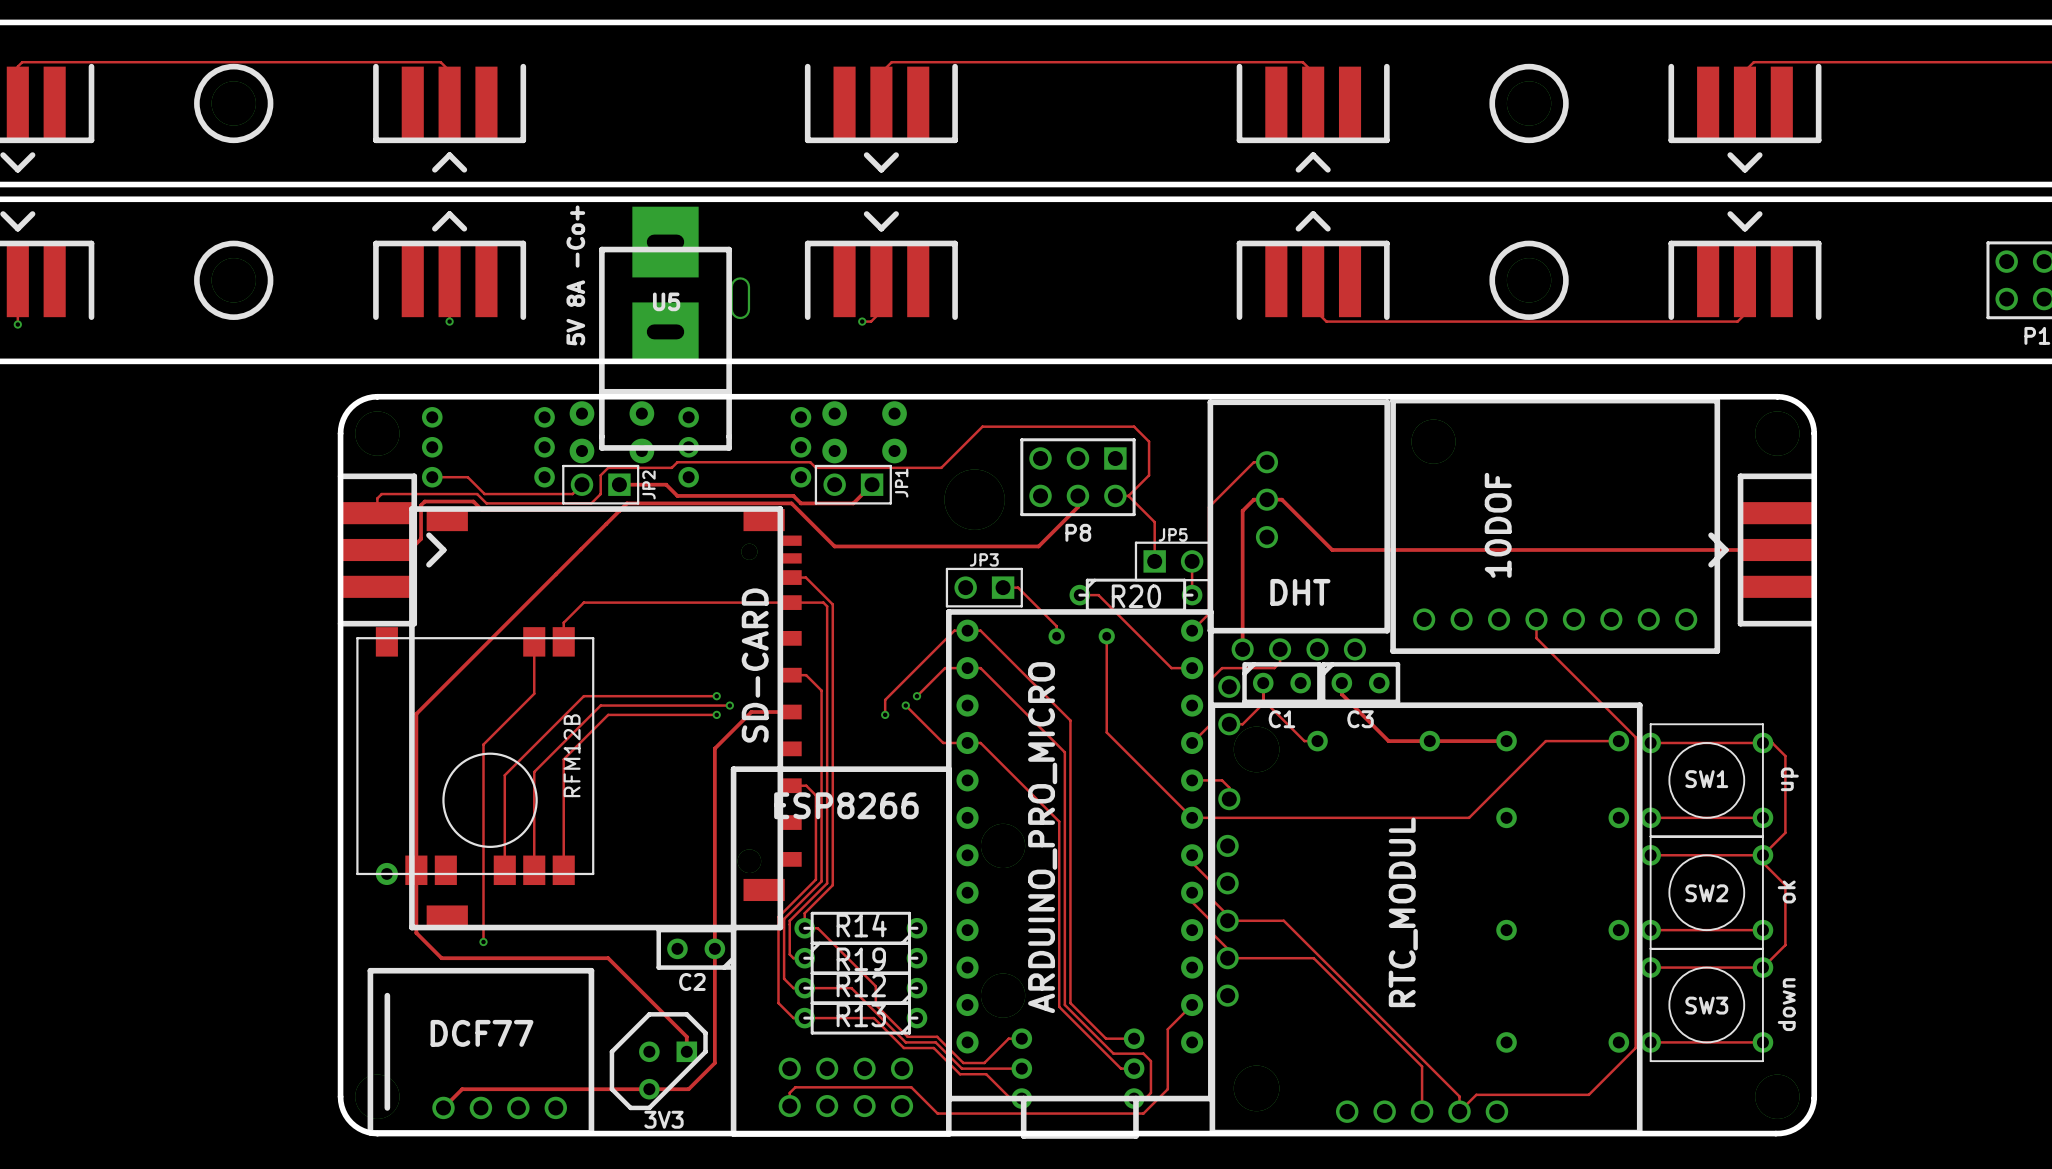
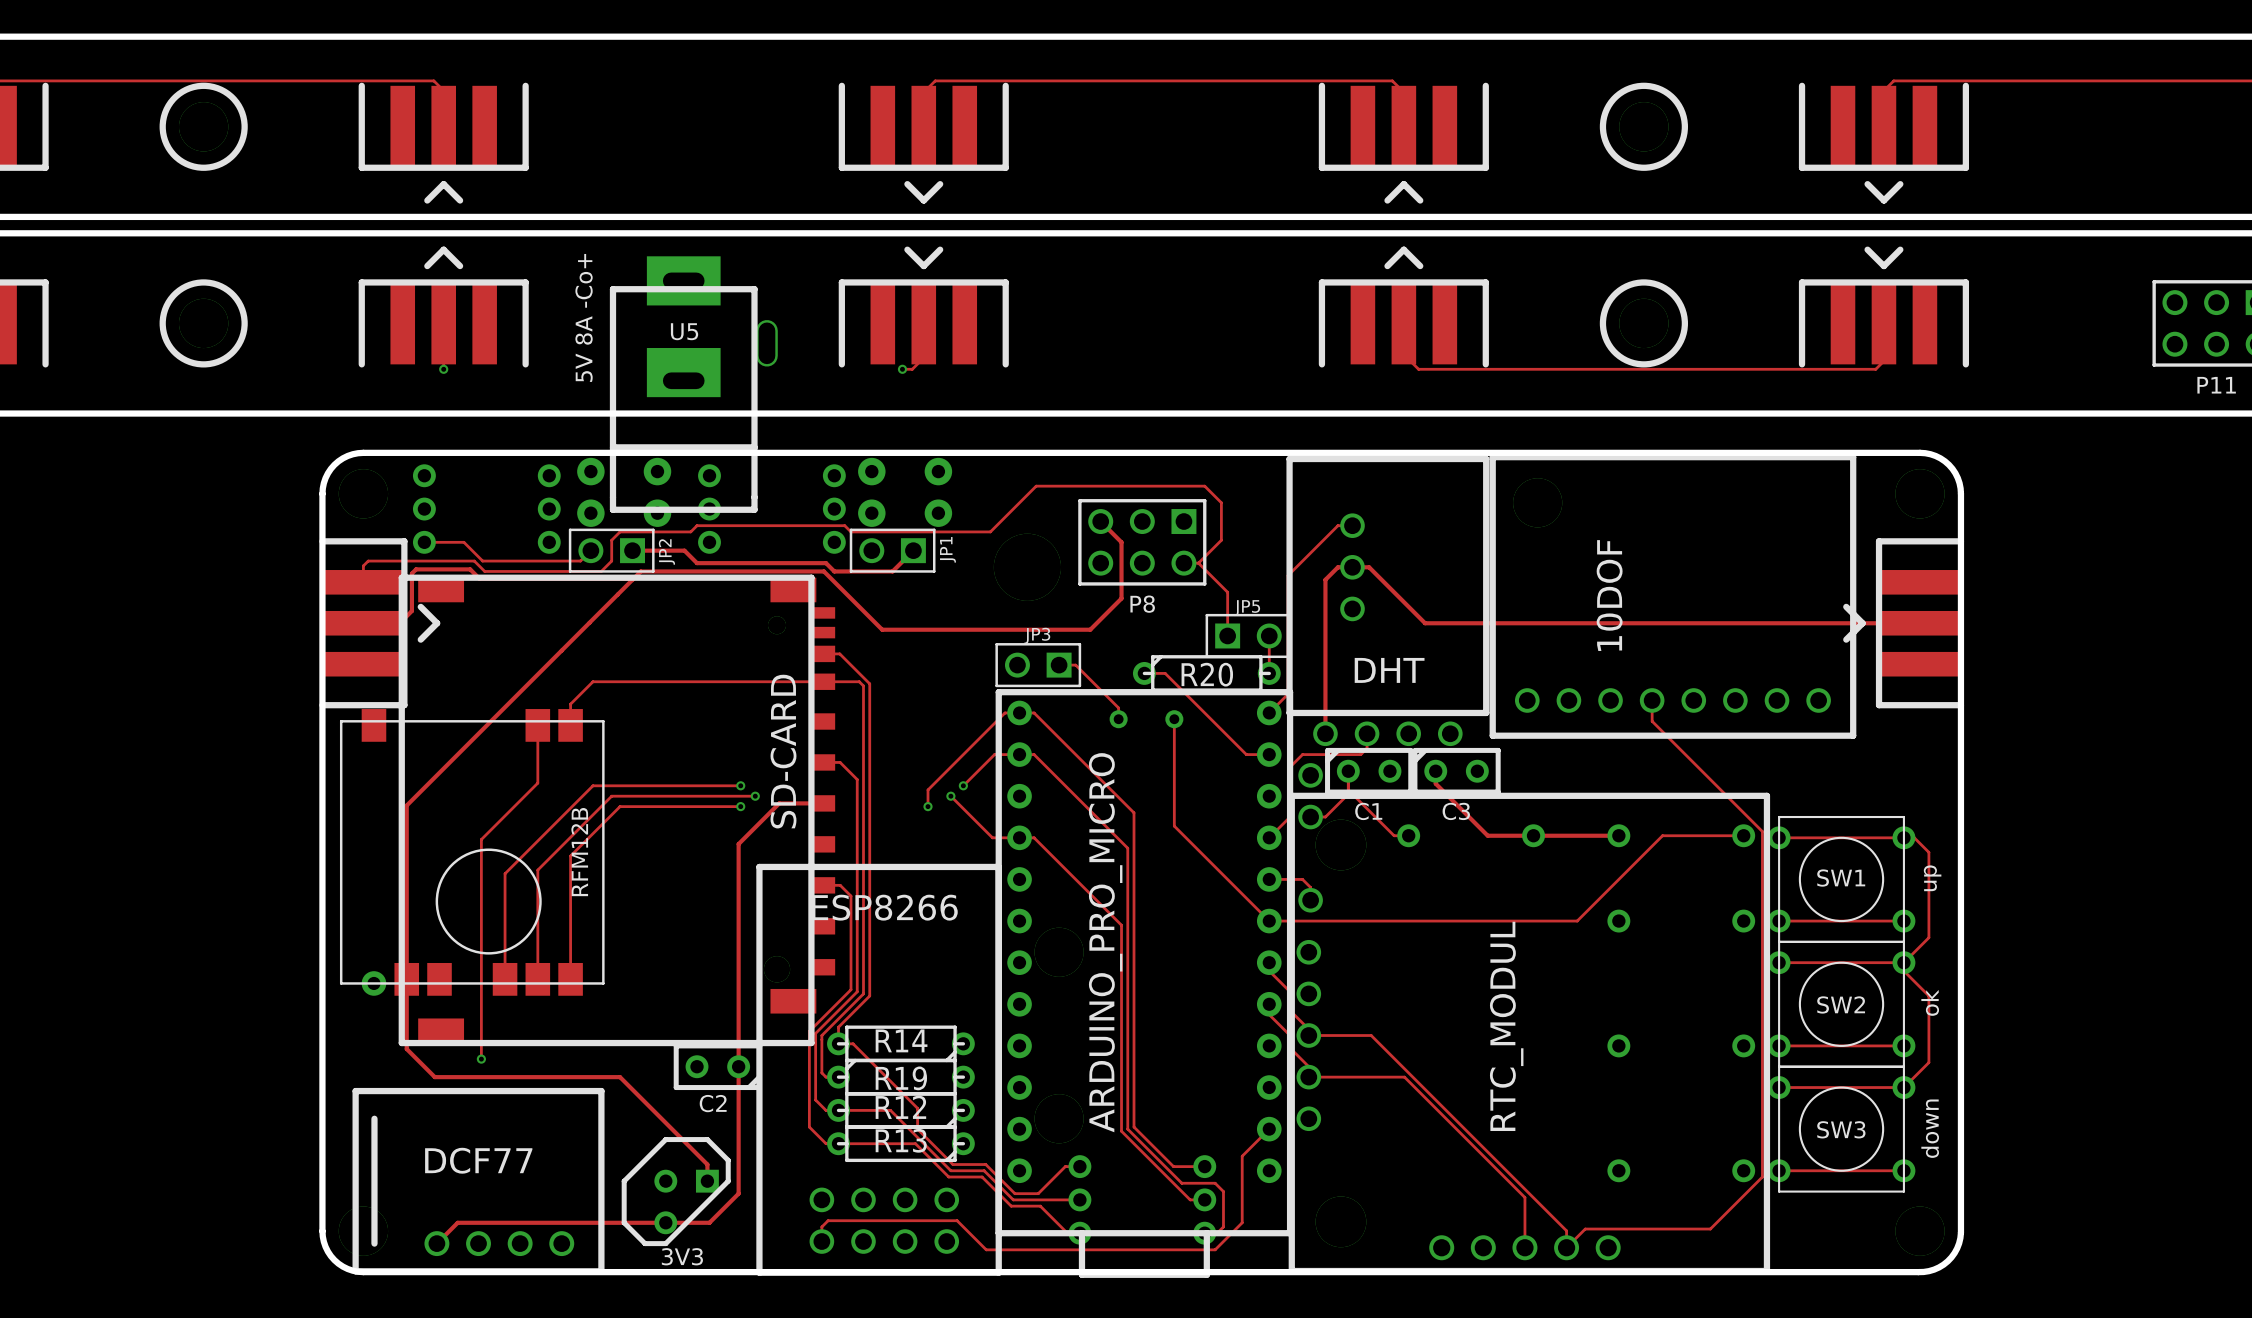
U5 footprint: [599, 206, 751, 451] -> [609, 256, 778, 513]
U5 name position: U5 (666, 301) -> U5 (684, 331)
track: (1077, 501) (1077, 507) (1038, 546) (834, 546) -> (1100, 521) (1121, 542) (1121, 598) (1090, 629) (882, 629) (871, 619)

